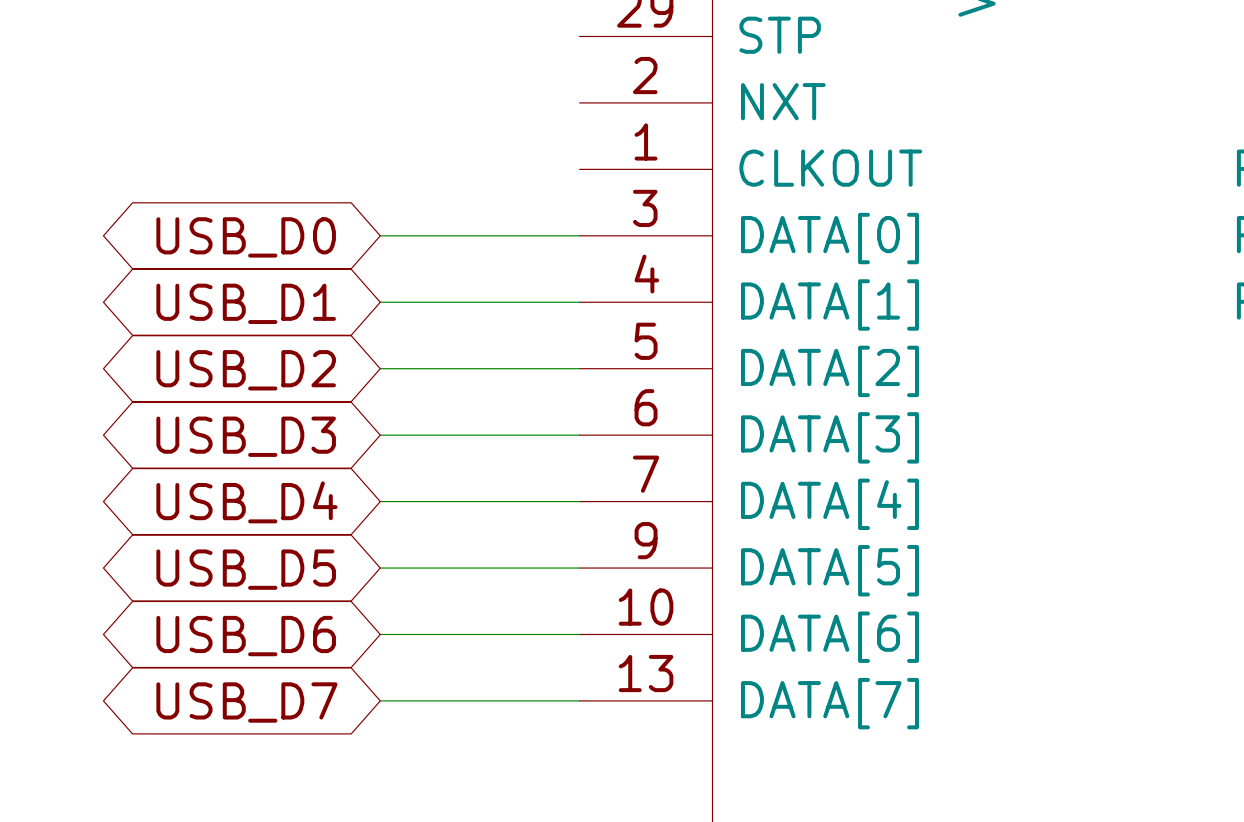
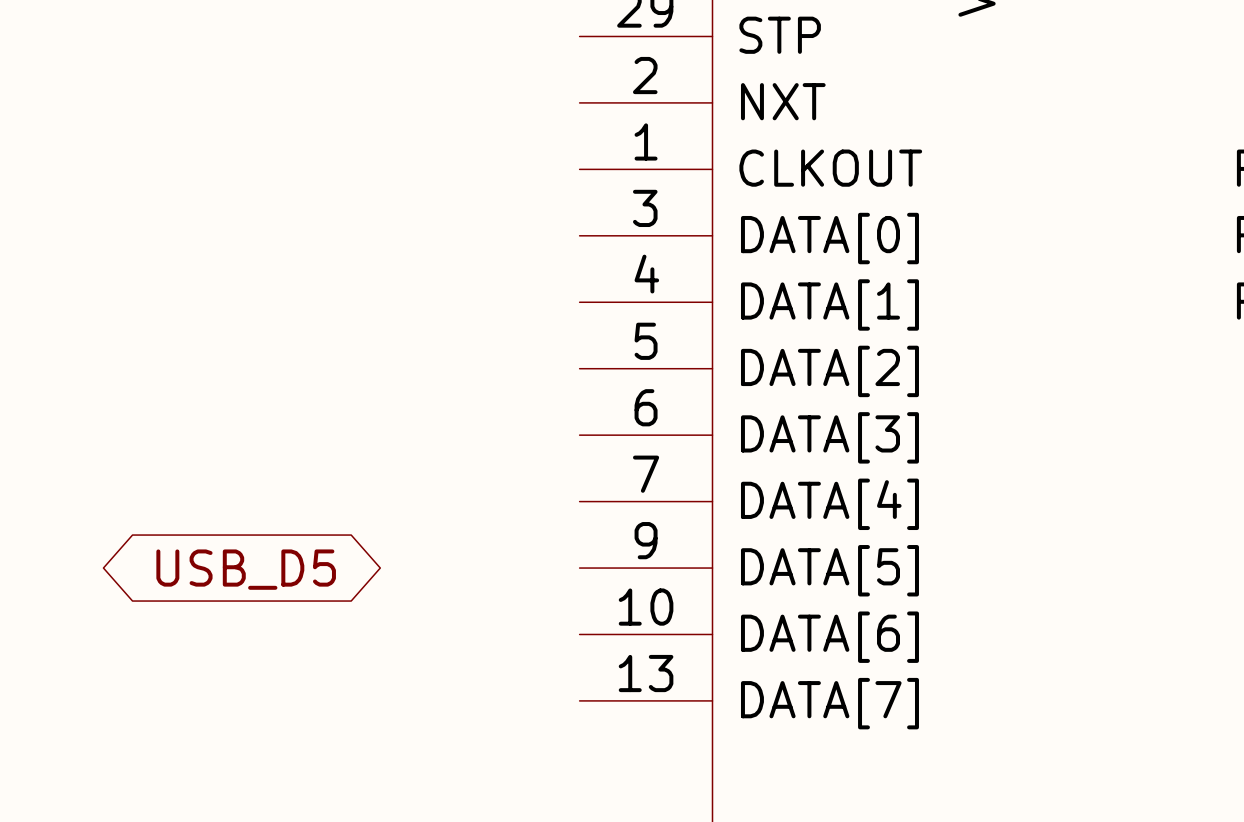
wire: (380, 235) (579, 235) -> none
global label: USB_D0 (246, 237) -> none
wire: (380, 302) (579, 302) -> none
global label: USB_D1 (246, 303) -> none
wire: (380, 368) (579, 368) -> none
global label: USB_D2 (246, 370) -> none
wire: (380, 435) (579, 435) -> none
global label: USB_D3 (246, 436) -> none
wire: (380, 501) (579, 501) -> none
global label: USB_D4 (246, 502) -> none
wire: (380, 568) (579, 568) -> none
wire: (380, 634) (579, 634) -> none
global label: USB_D6 (246, 636) -> none
wire: (380, 700) (579, 700) -> none
global label: USB_D7 (246, 702) -> none

